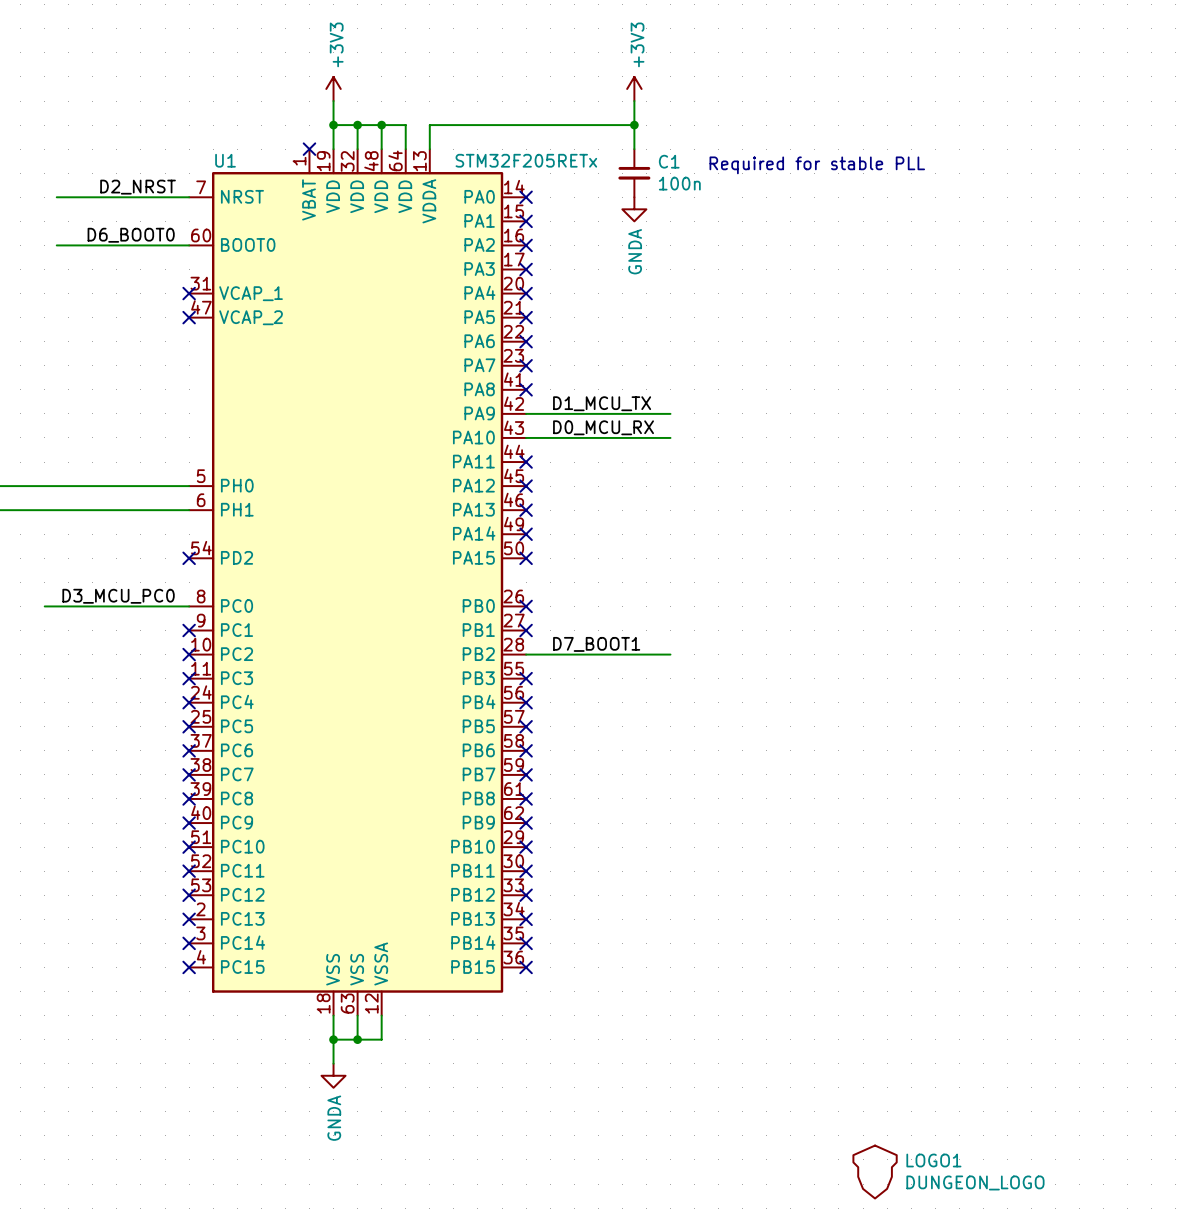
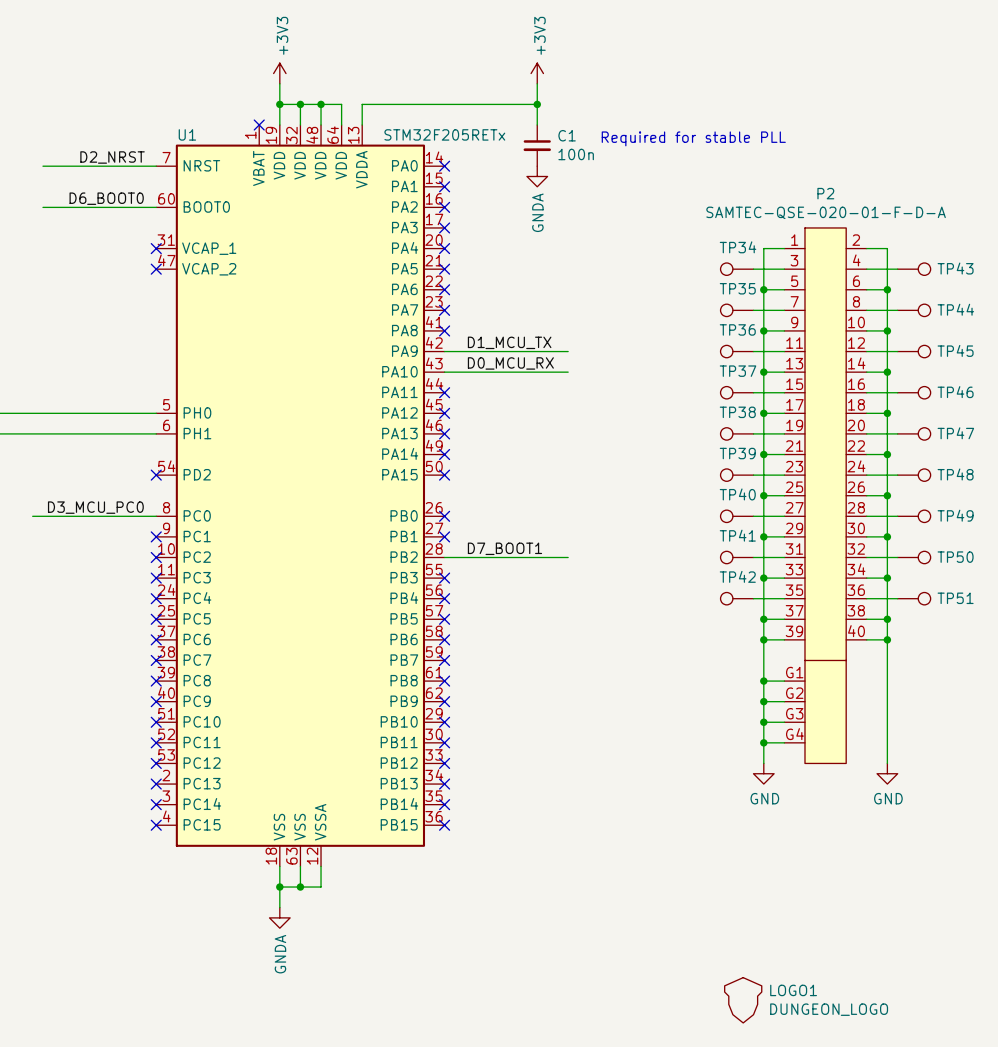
wire: none -> (784, 248) (763, 248) (763, 763)
wire: none -> (866, 248) (887, 248) (887, 763)
TP34: none -> (737, 269)
wire: none -> (753, 269) (784, 269)
wire: none -> (866, 269) (897, 269)
TP43: none -> (914, 269)
wire: none -> (763, 289) (784, 289)
junction: none -> (763, 289)
wire: none -> (866, 289) (887, 289)
junction: none -> (887, 289)
TP35: none -> (737, 310)
wire: none -> (753, 310) (784, 310)
wire: none -> (866, 310) (897, 310)
TP44: none -> (914, 310)
wire: none -> (763, 330) (784, 330)
junction: none -> (763, 330)
wire: none -> (866, 330) (887, 330)
junction: none -> (887, 330)
TP36: none -> (737, 351)
wire: none -> (753, 351) (784, 351)
wire: none -> (866, 351) (897, 351)
TP45: none -> (914, 351)
wire: none -> (763, 372) (784, 372)
junction: none -> (763, 372)
wire: none -> (866, 372) (887, 372)
junction: none -> (887, 372)
TP37: none -> (737, 392)
wire: none -> (753, 392) (784, 392)
wire: none -> (866, 392) (897, 392)
TP46: none -> (914, 392)
wire: none -> (763, 413) (784, 413)
junction: none -> (763, 413)
wire: none -> (866, 413) (887, 413)
junction: none -> (887, 413)
TP38: none -> (737, 433)
wire: none -> (753, 433) (784, 433)
wire: none -> (866, 433) (897, 433)
TP47: none -> (914, 433)
wire: none -> (763, 454) (784, 454)
junction: none -> (763, 454)
wire: none -> (866, 454) (887, 454)
junction: none -> (887, 454)
TP39: none -> (737, 475)
wire: none -> (753, 475) (784, 475)
wire: none -> (866, 475) (897, 475)
TP48: none -> (914, 475)
wire: none -> (763, 495) (784, 495)
junction: none -> (763, 495)
P2: none -> SAMTEC-QSE-020-01-F-D-A (825, 495)
wire: none -> (866, 495) (887, 495)
junction: none -> (887, 495)
TP40: none -> (737, 516)
wire: none -> (753, 516) (784, 516)
wire: none -> (866, 516) (897, 516)
TP49: none -> (914, 516)
wire: none -> (763, 536) (784, 536)
junction: none -> (763, 536)
wire: none -> (866, 536) (887, 536)
junction: none -> (887, 536)
TP41: none -> (737, 557)
wire: none -> (753, 557) (784, 557)
wire: none -> (866, 557) (897, 557)
TP50: none -> (914, 557)
wire: none -> (763, 578) (784, 578)
junction: none -> (763, 578)
wire: none -> (866, 578) (887, 578)
junction: none -> (887, 578)
TP42: none -> (737, 598)
wire: none -> (753, 598) (784, 598)
wire: none -> (866, 598) (897, 598)
TP51: none -> (914, 598)
wire: none -> (763, 619) (784, 619)
junction: none -> (763, 619)
wire: none -> (866, 619) (887, 619)
junction: none -> (887, 619)
wire: none -> (763, 639) (784, 639)
junction: none -> (763, 639)
wire: none -> (866, 639) (887, 639)
junction: none -> (887, 639)
wire: none -> (763, 681) (784, 681)
junction: none -> (763, 681)
wire: none -> (763, 701) (784, 701)
junction: none -> (763, 701)
wire: none -> (763, 722) (784, 722)
junction: none -> (763, 722)
wire: none -> (763, 742) (784, 742)
junction: none -> (763, 742)
power symbol: none -> GND (763, 773)
power symbol: none -> GND (887, 773)

